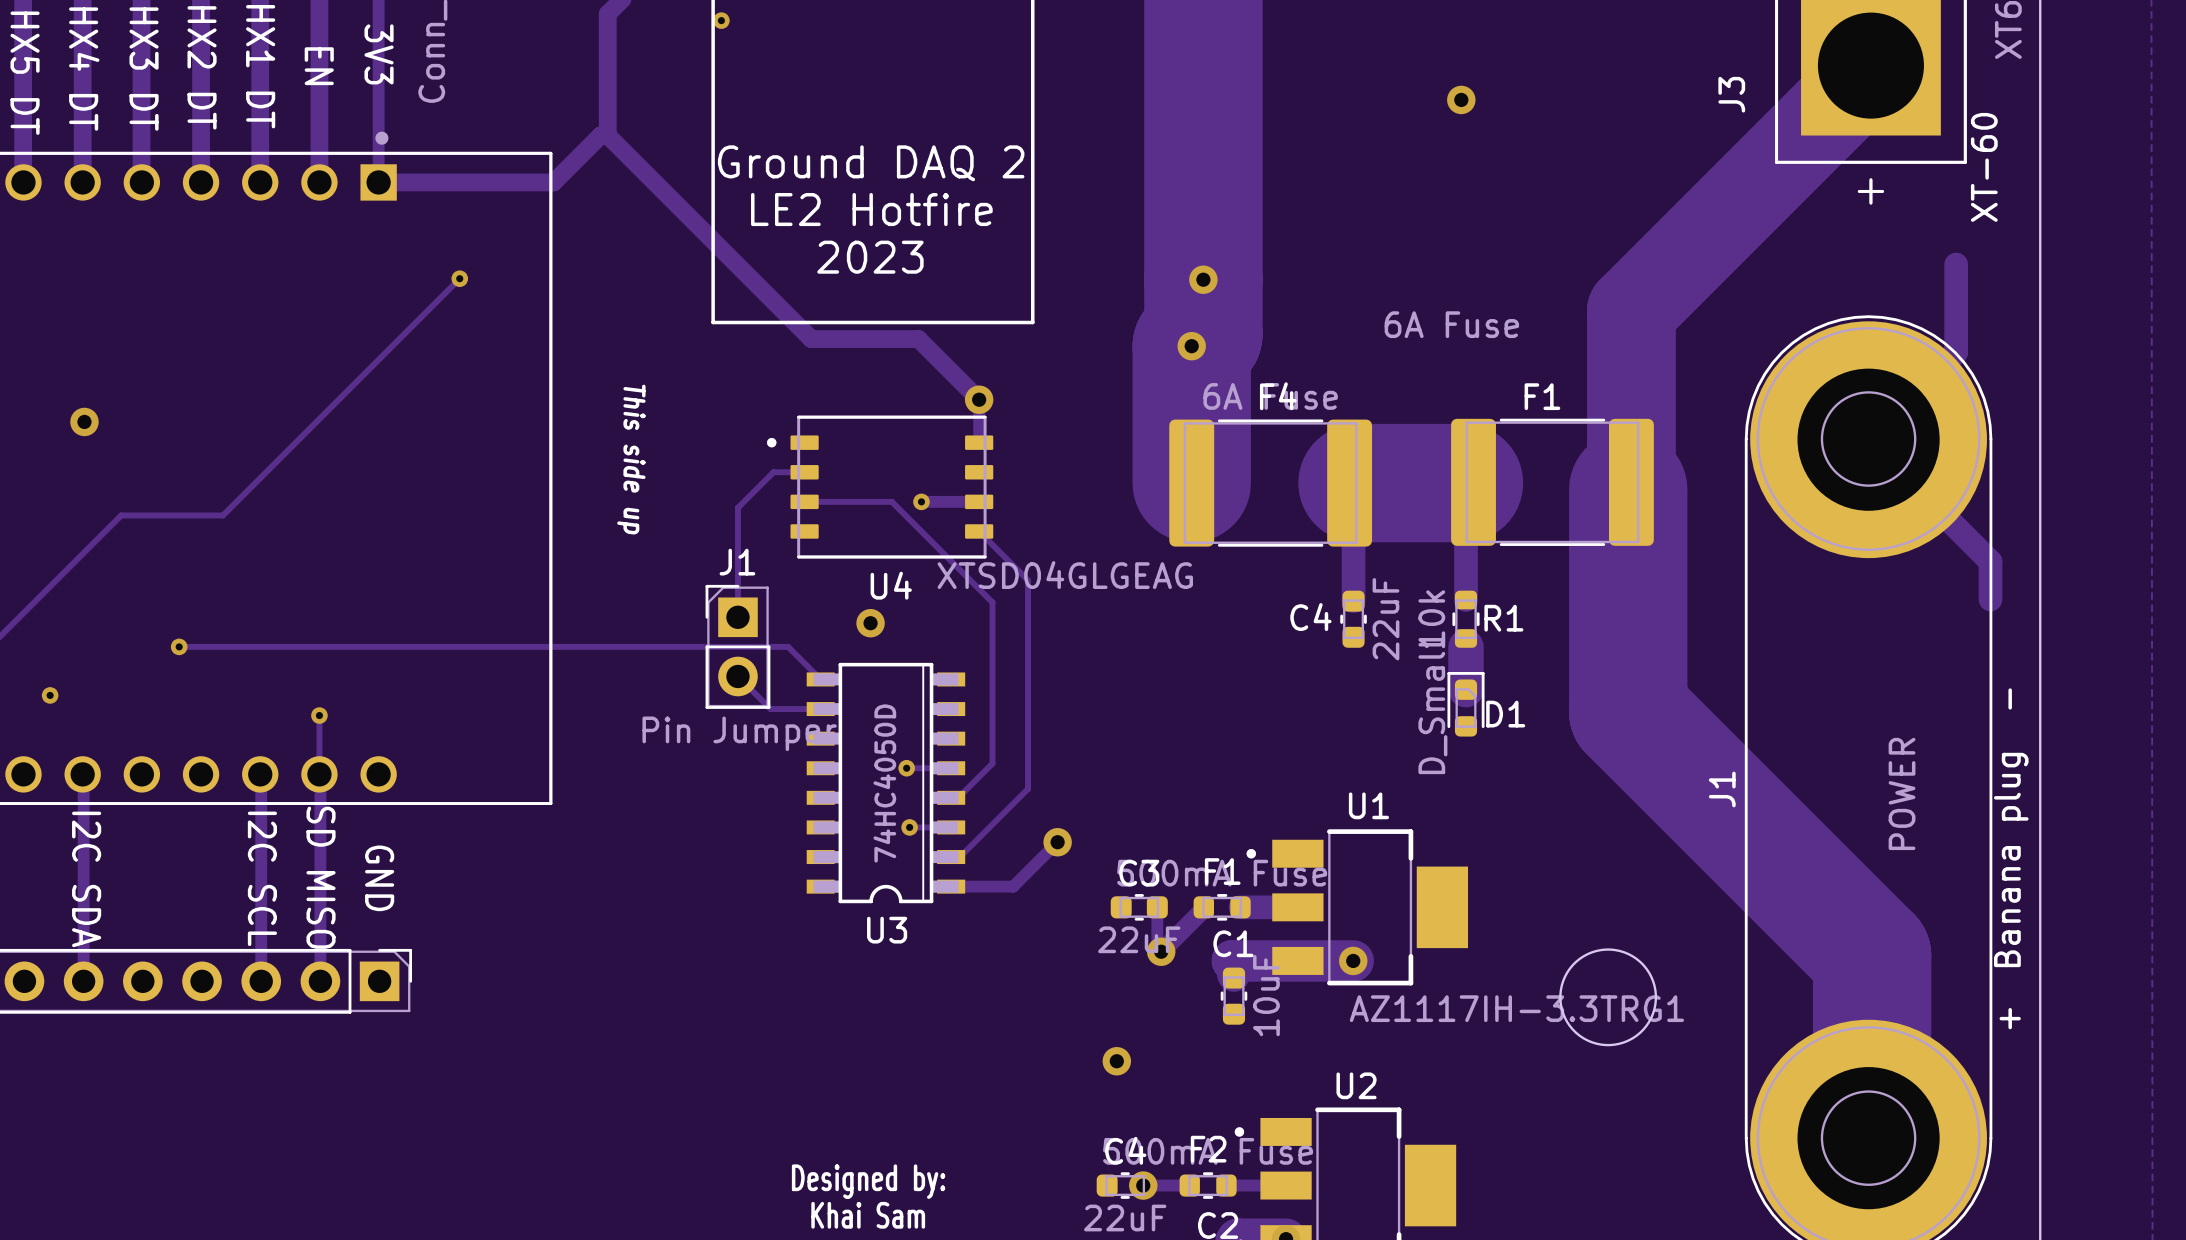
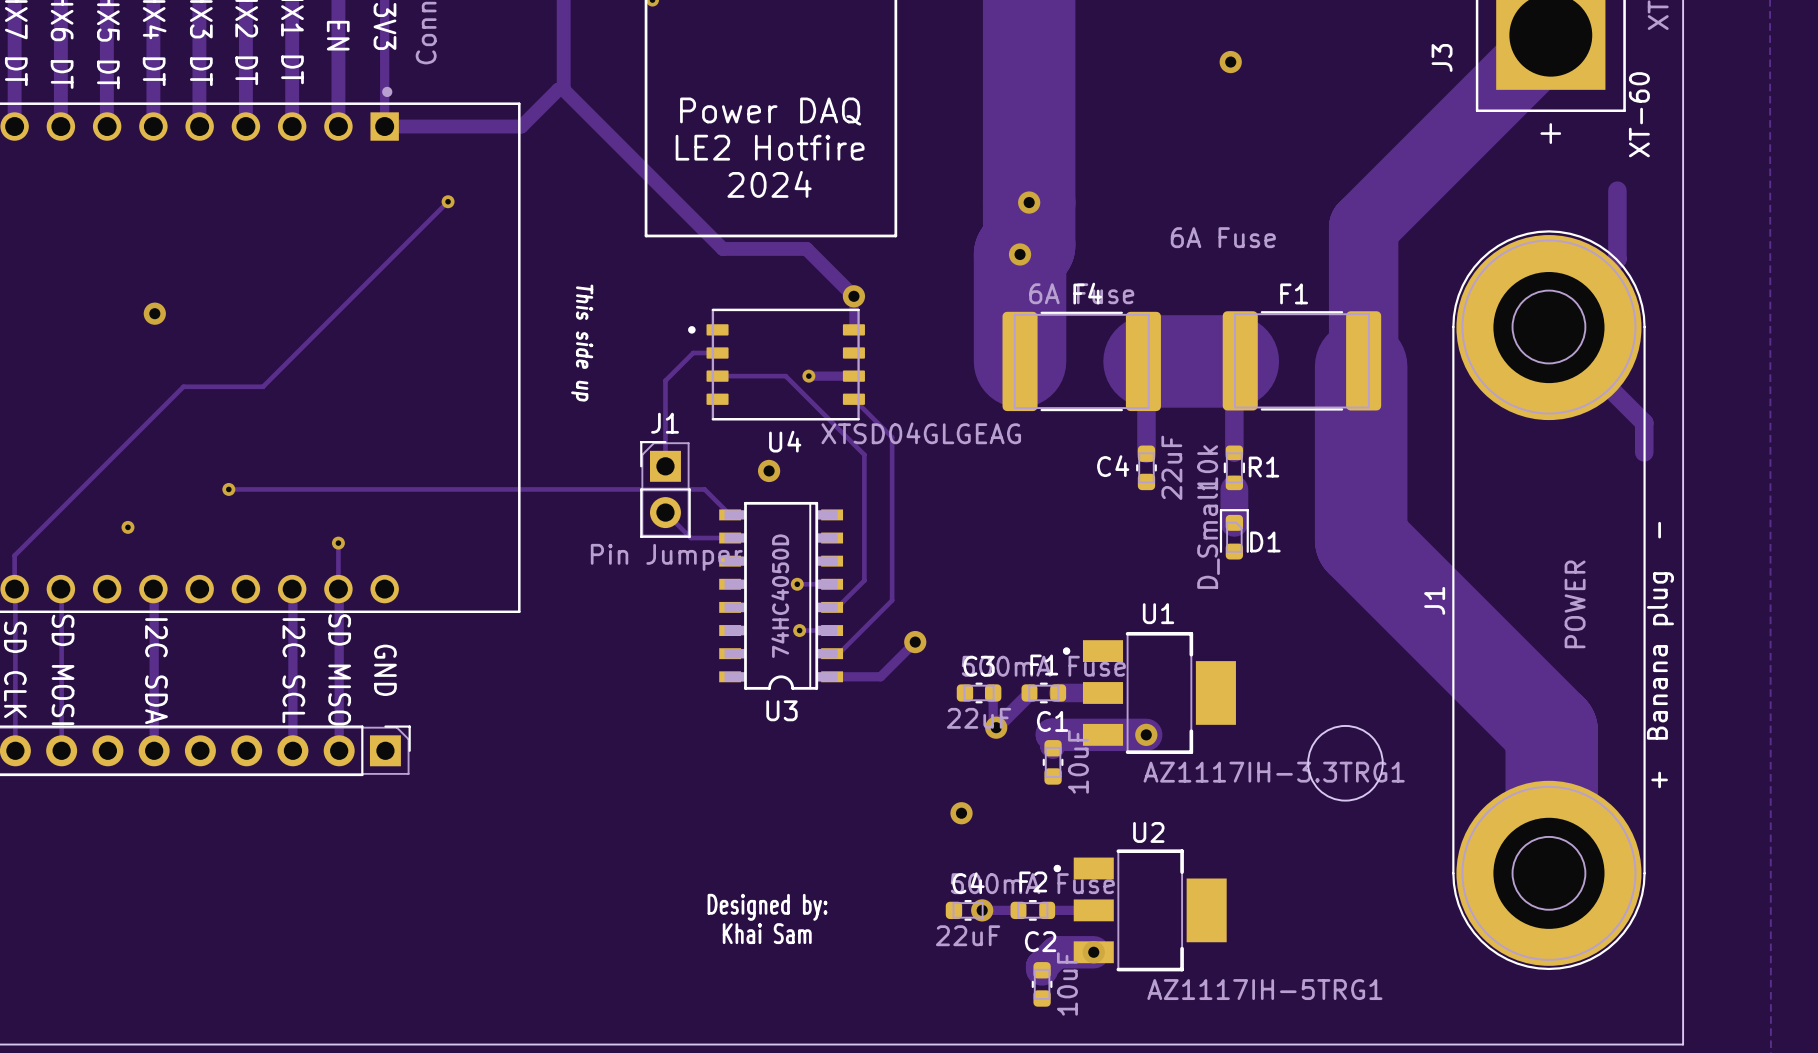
text: Ground DAQ 2 (871, 163) -> Power DAQ (770, 111)
text: 2023 (870, 257) -> 2024 (769, 184)

